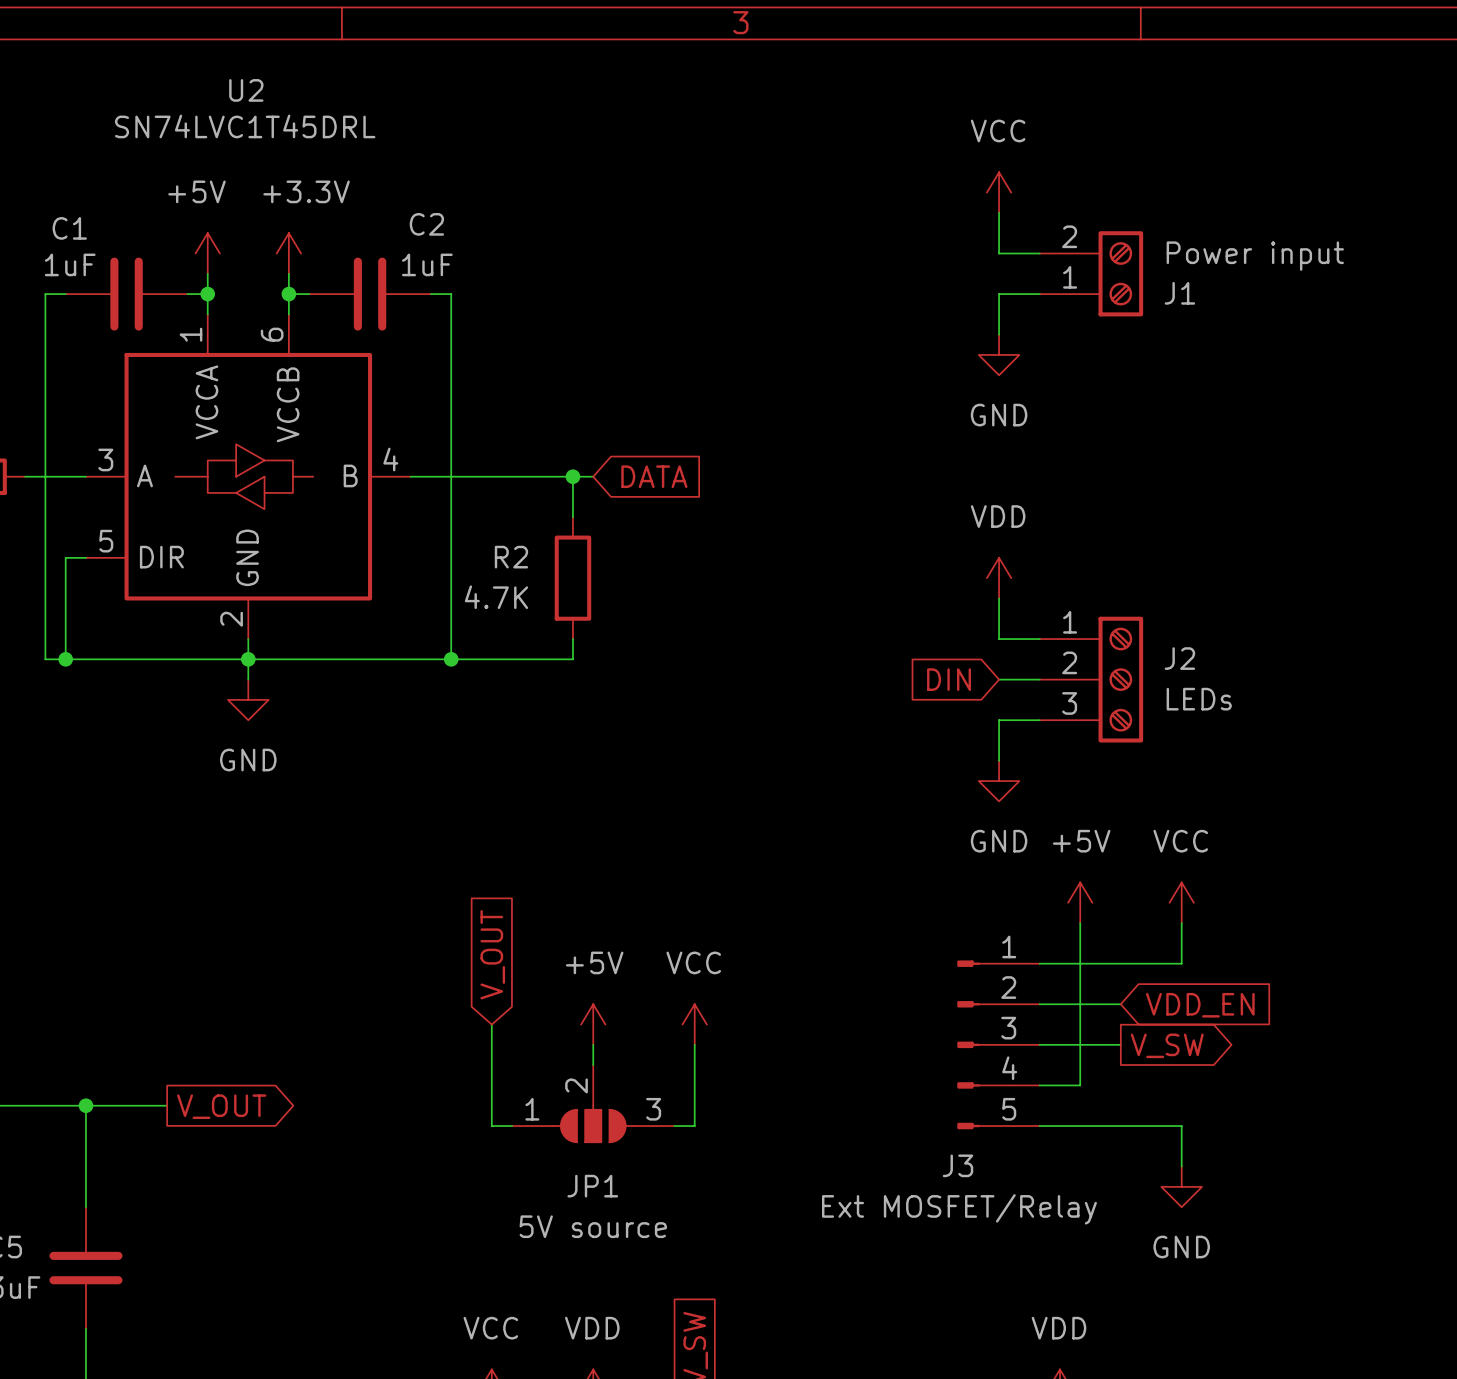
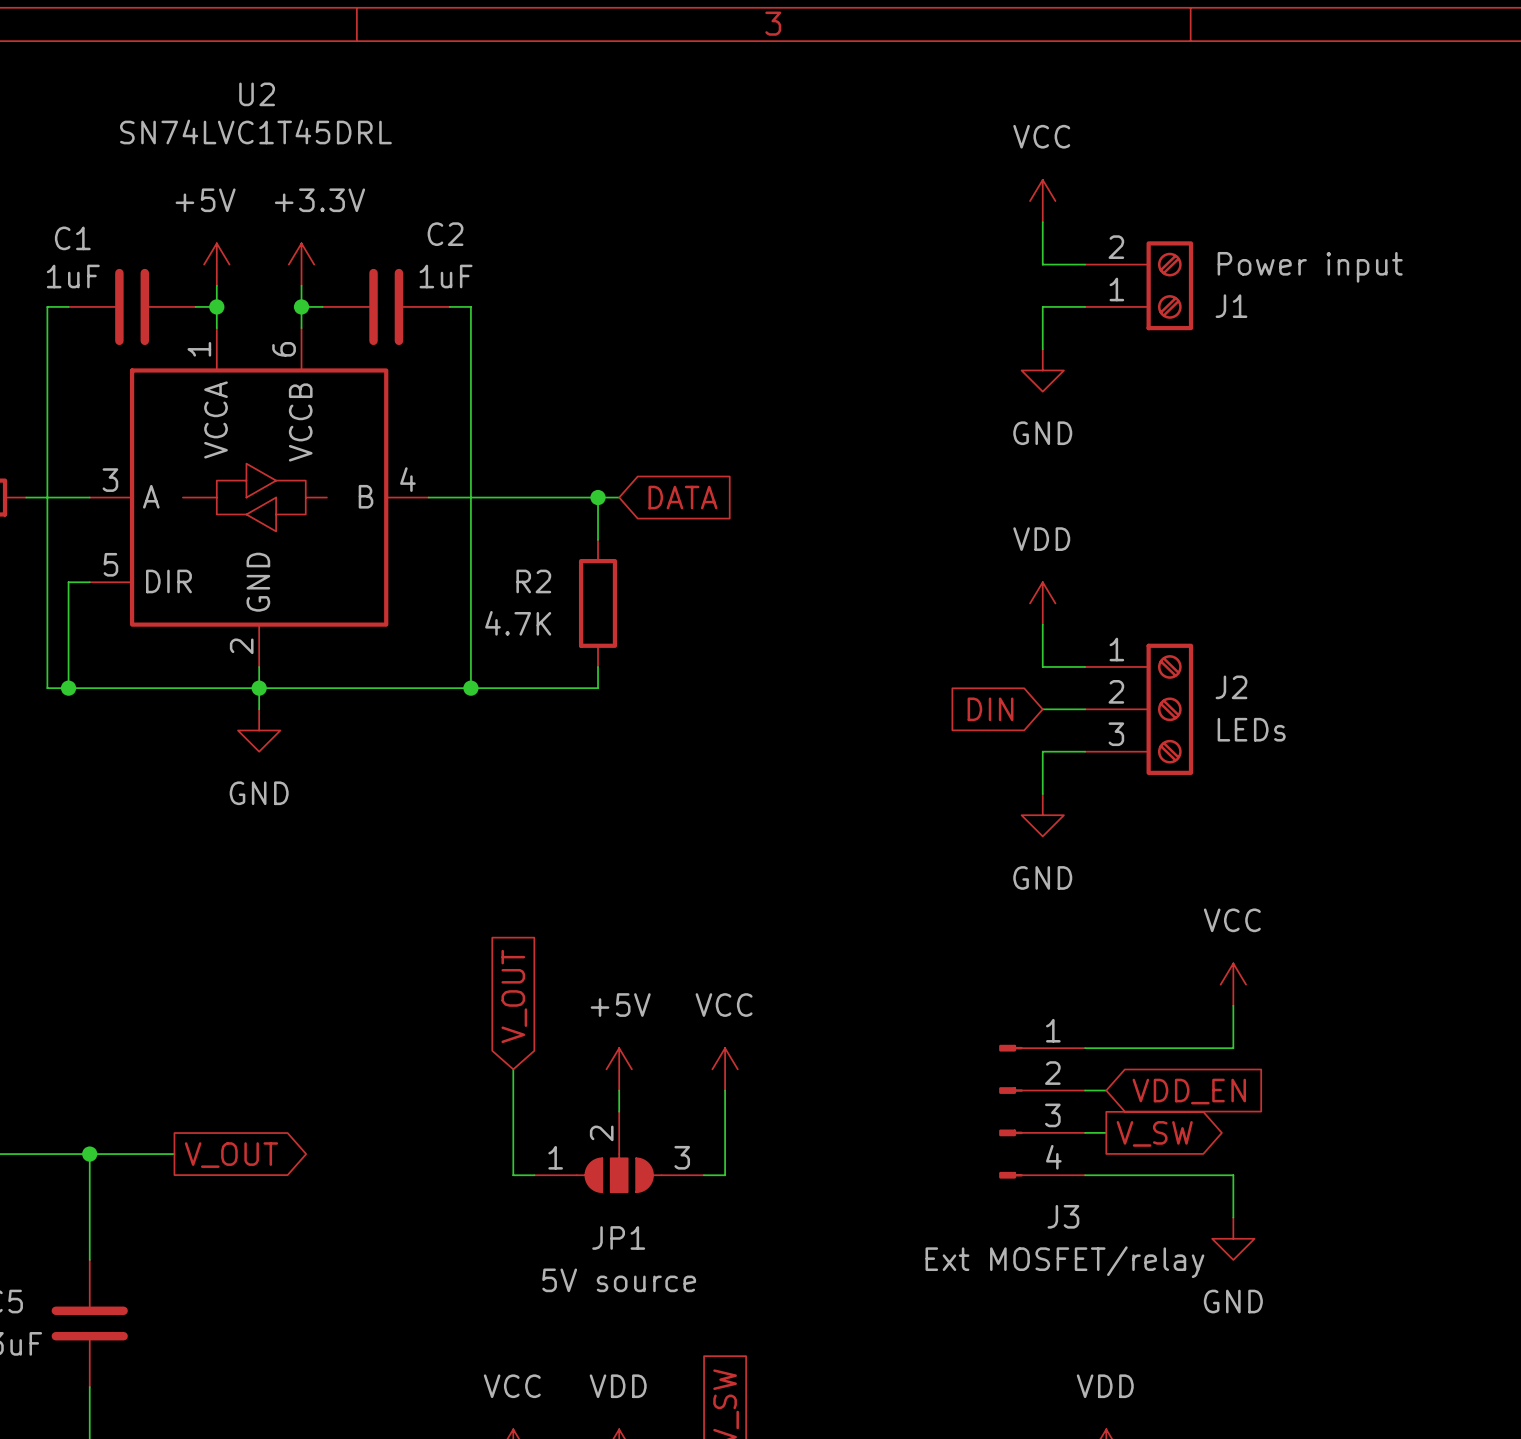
power symbol: +5V (1080, 902) -> none
power symbol position: VCC (1181, 902) -> VCC (1233, 984)
wire: (1080, 923) (1080, 1085) (1059, 1085) -> none
wire: (1181, 923) (1181, 963) (1039, 963) -> none
J3 symbol: [957, 960, 1040, 1130] -> [999, 1044, 1086, 1179]
wire: none -> (1233, 1005) (1233, 1048) (1169, 1048)
global label position: VDD_EN (1200, 1005) -> VDD_EN (1189, 1091)
wire: (1059, 1044) (1120, 1044) -> none
global label position: V_SW (1167, 1045) -> V_SW (1154, 1133)
J3 name position: J3 (958, 1165) -> J3 (1063, 1216)
J3 value: Ext MOSFET/Relay (959, 1209) -> Ext MOSFET/relay (1064, 1262)

